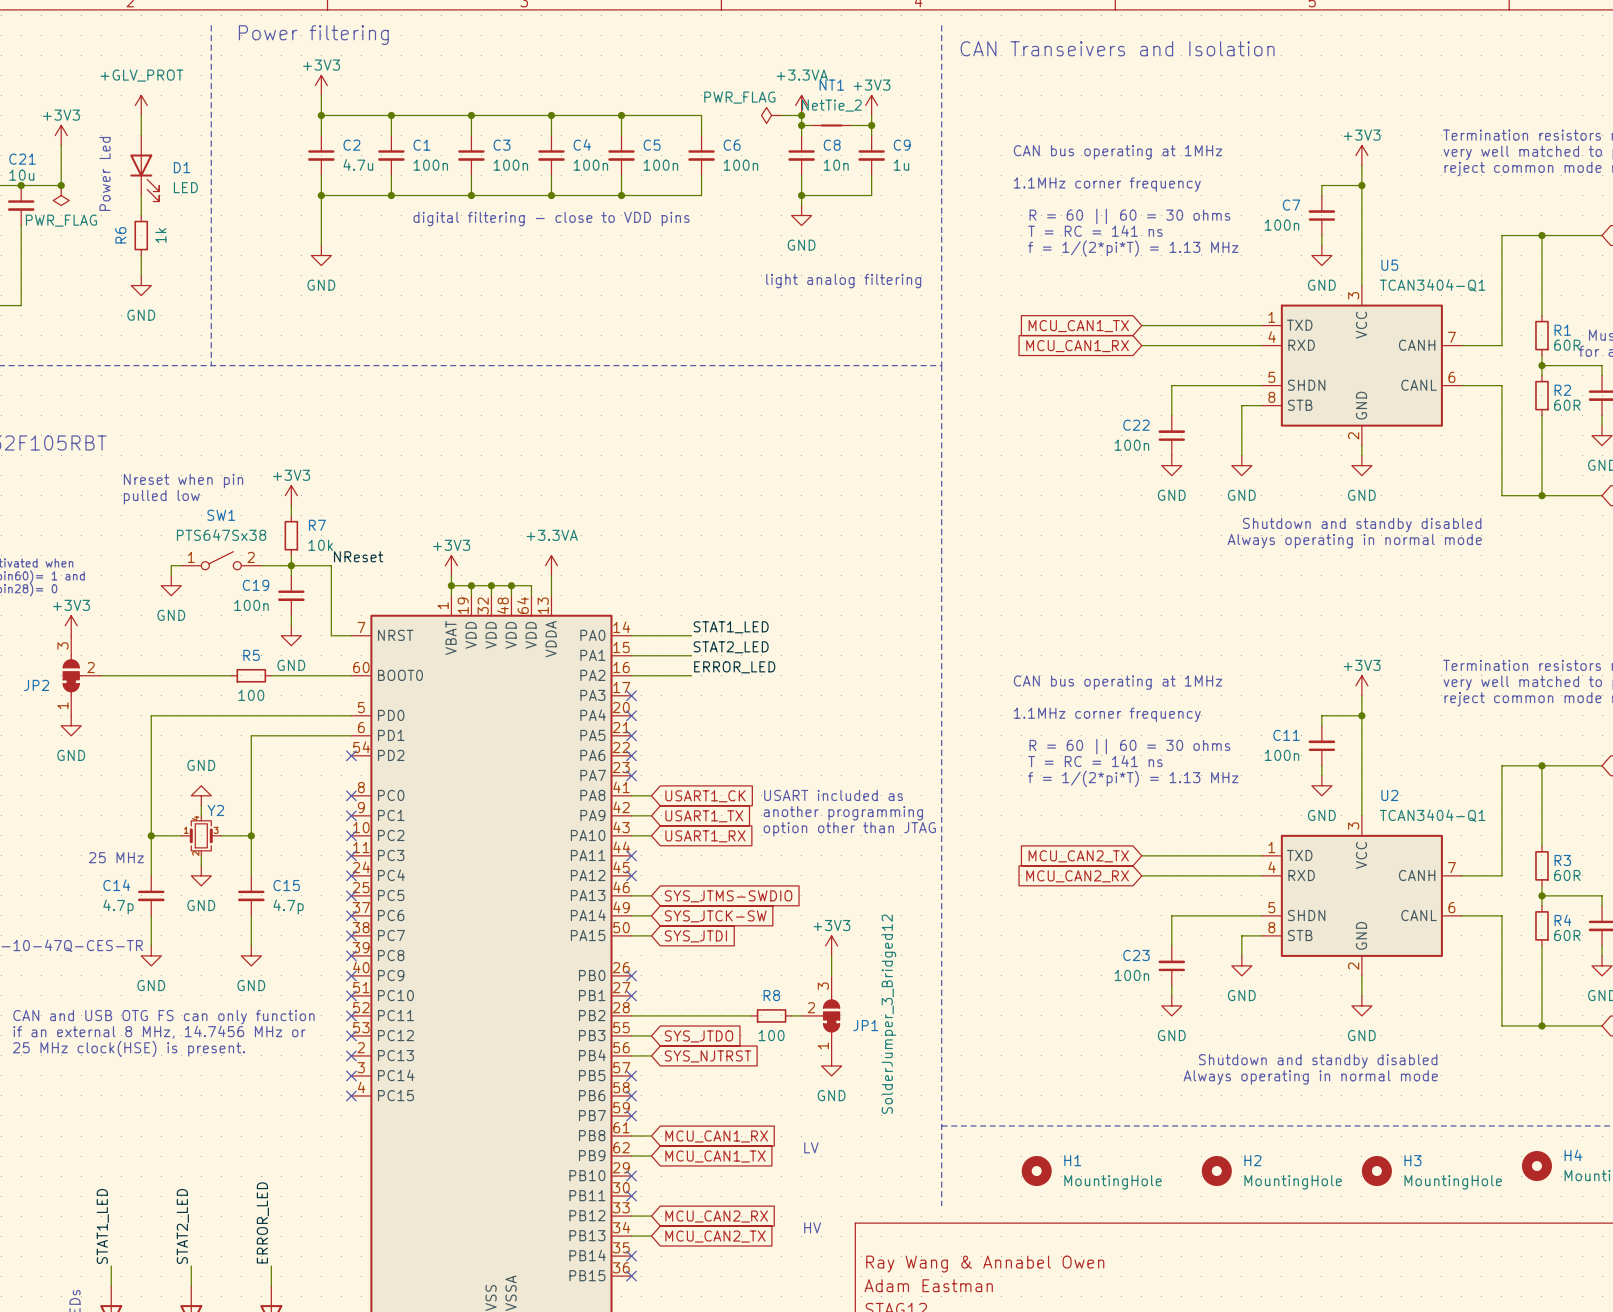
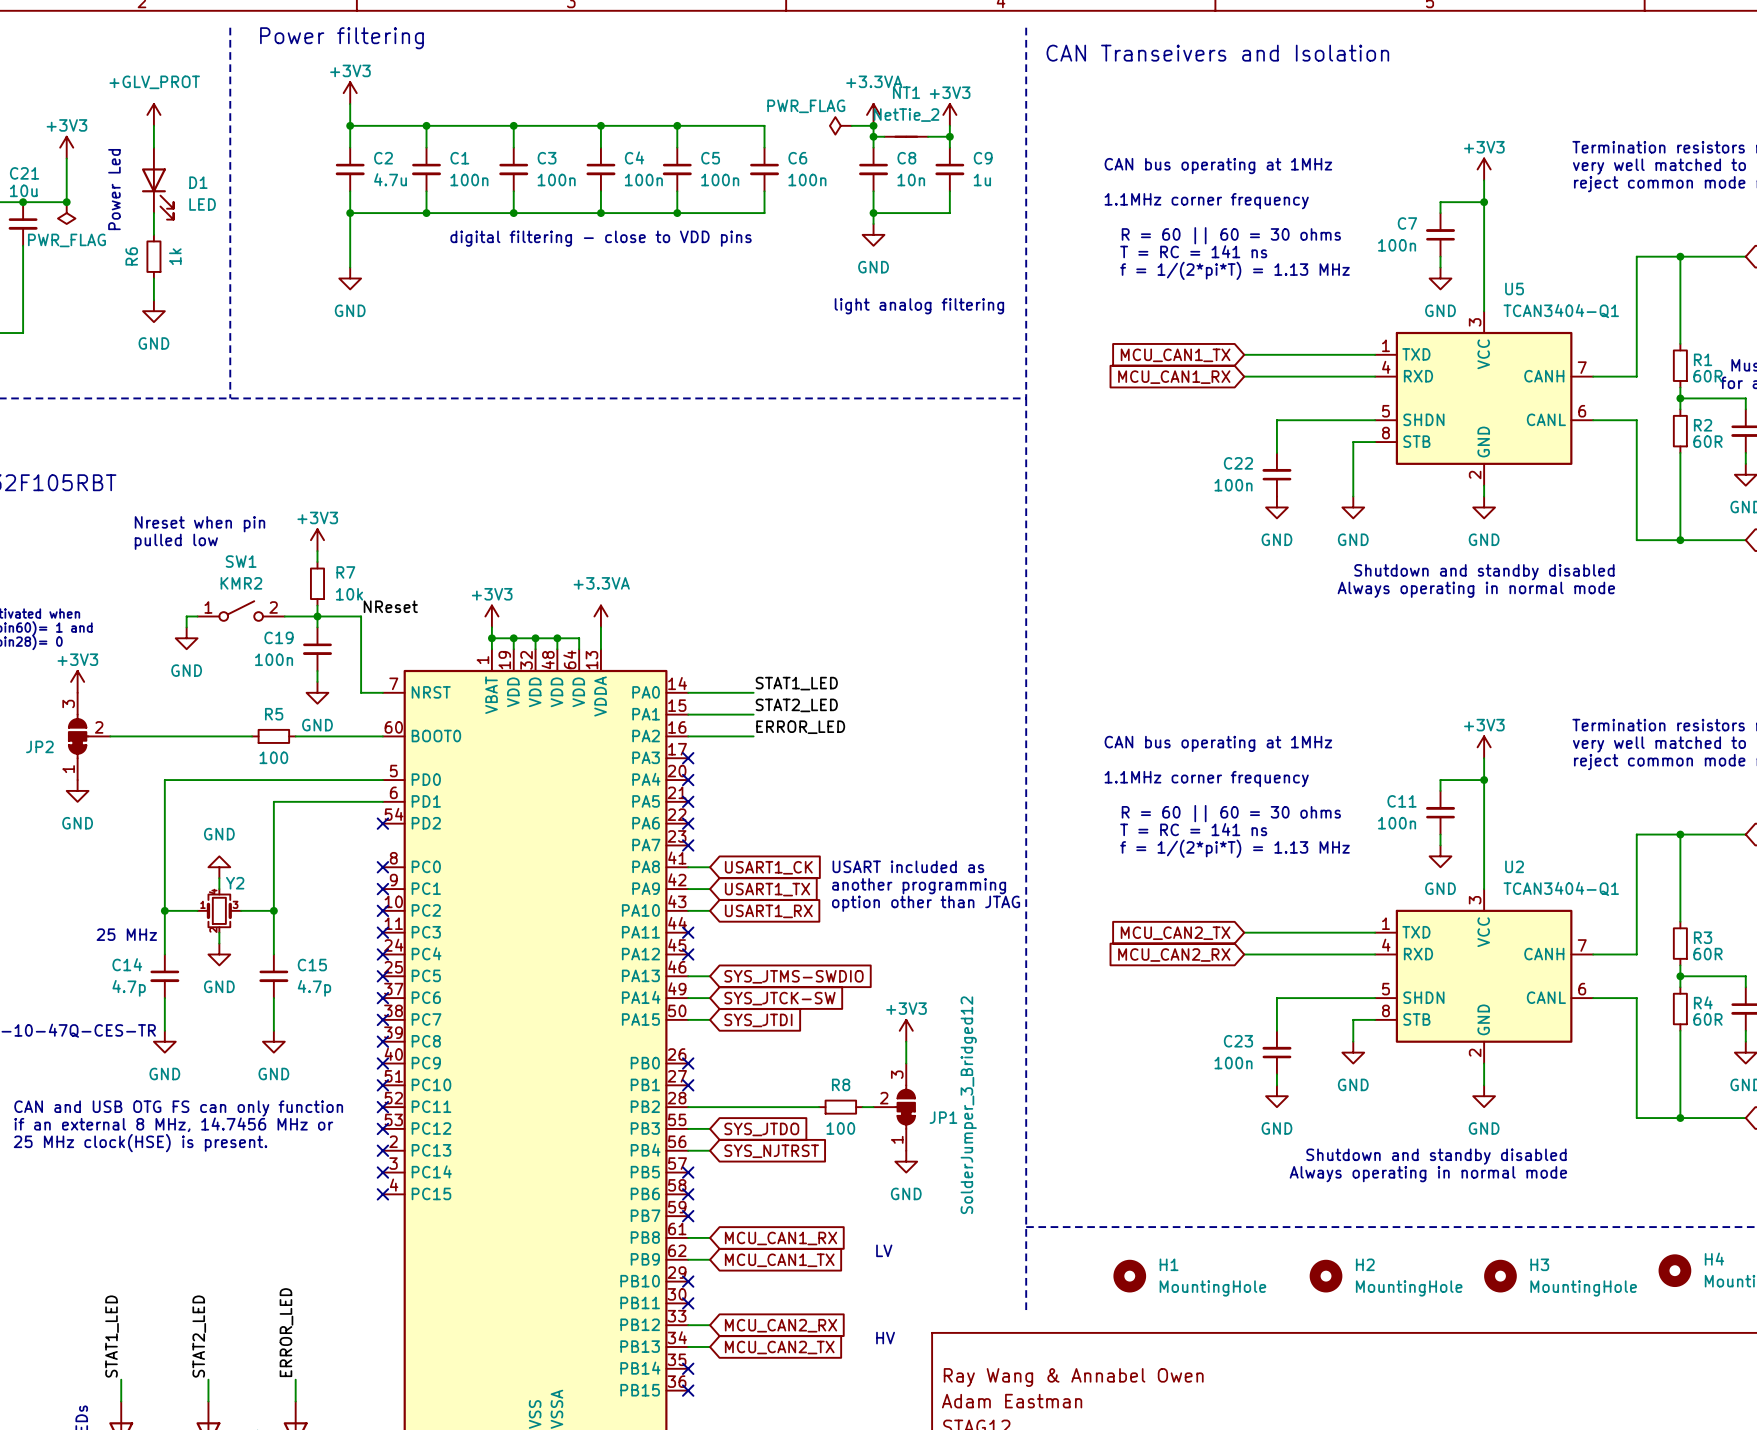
SW1 value: PTS647Sx38 (221, 535) -> KMR2 (241, 583)

